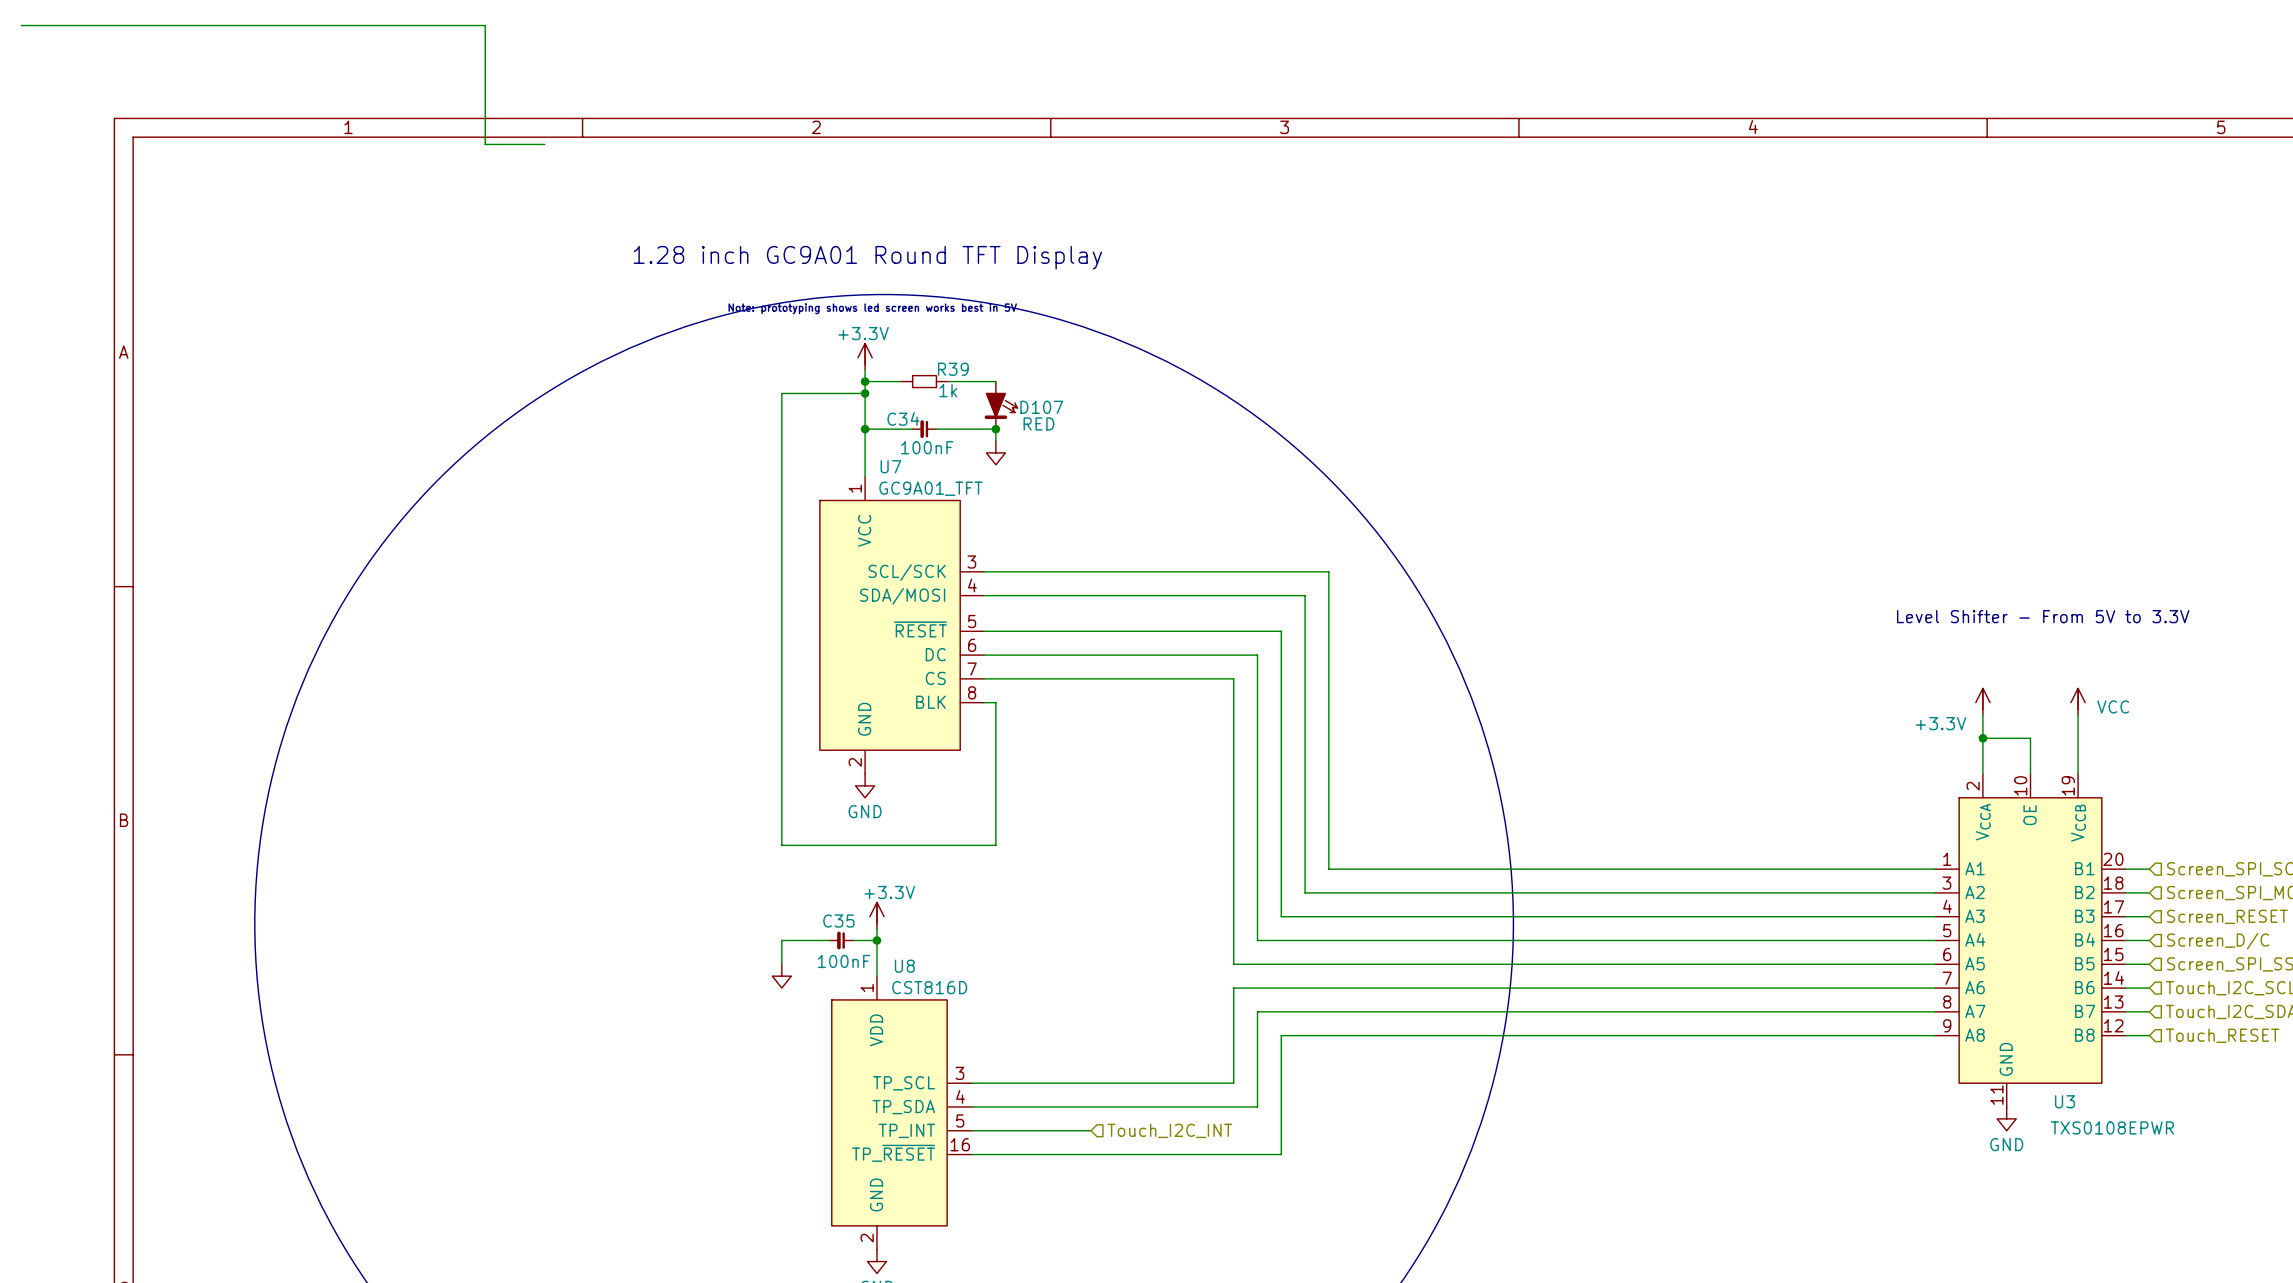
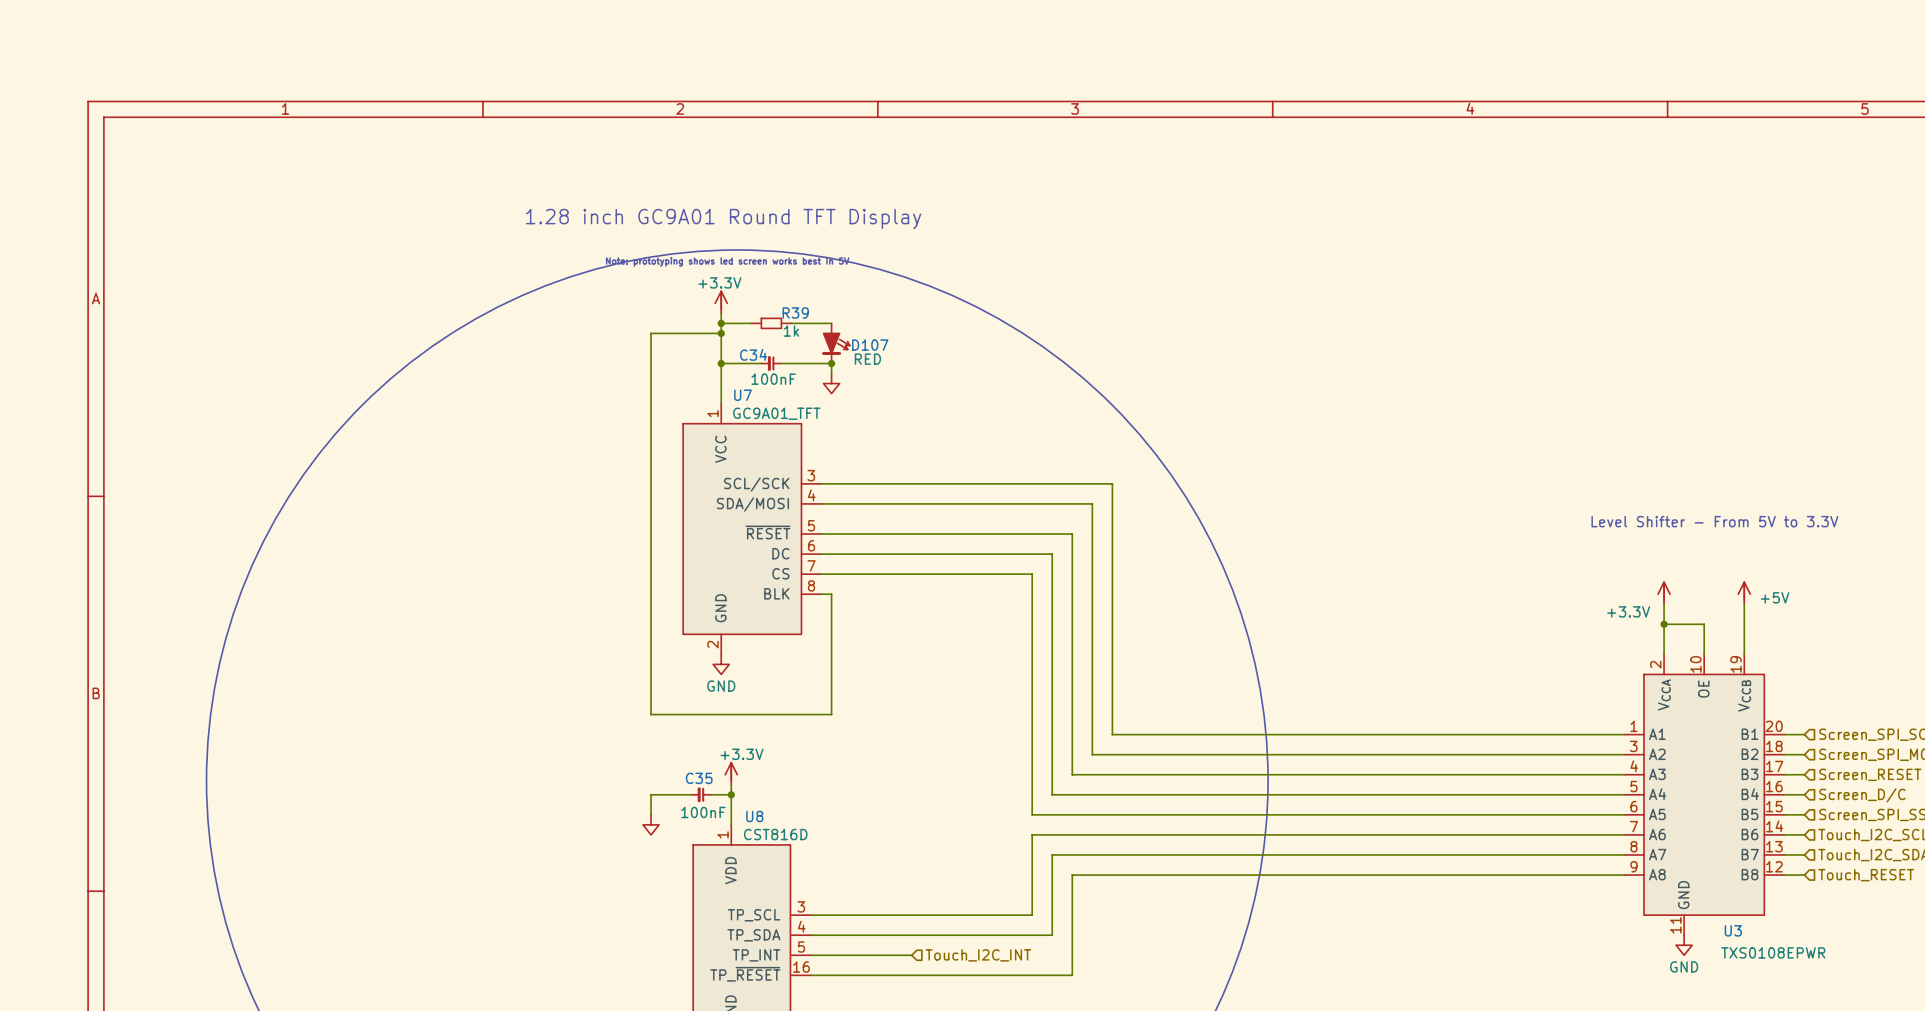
wire: (21, 25) (485, 25) (485, 144) (544, 144) -> none
power symbol: VCC (2078, 701) -> +5V (1744, 593)

